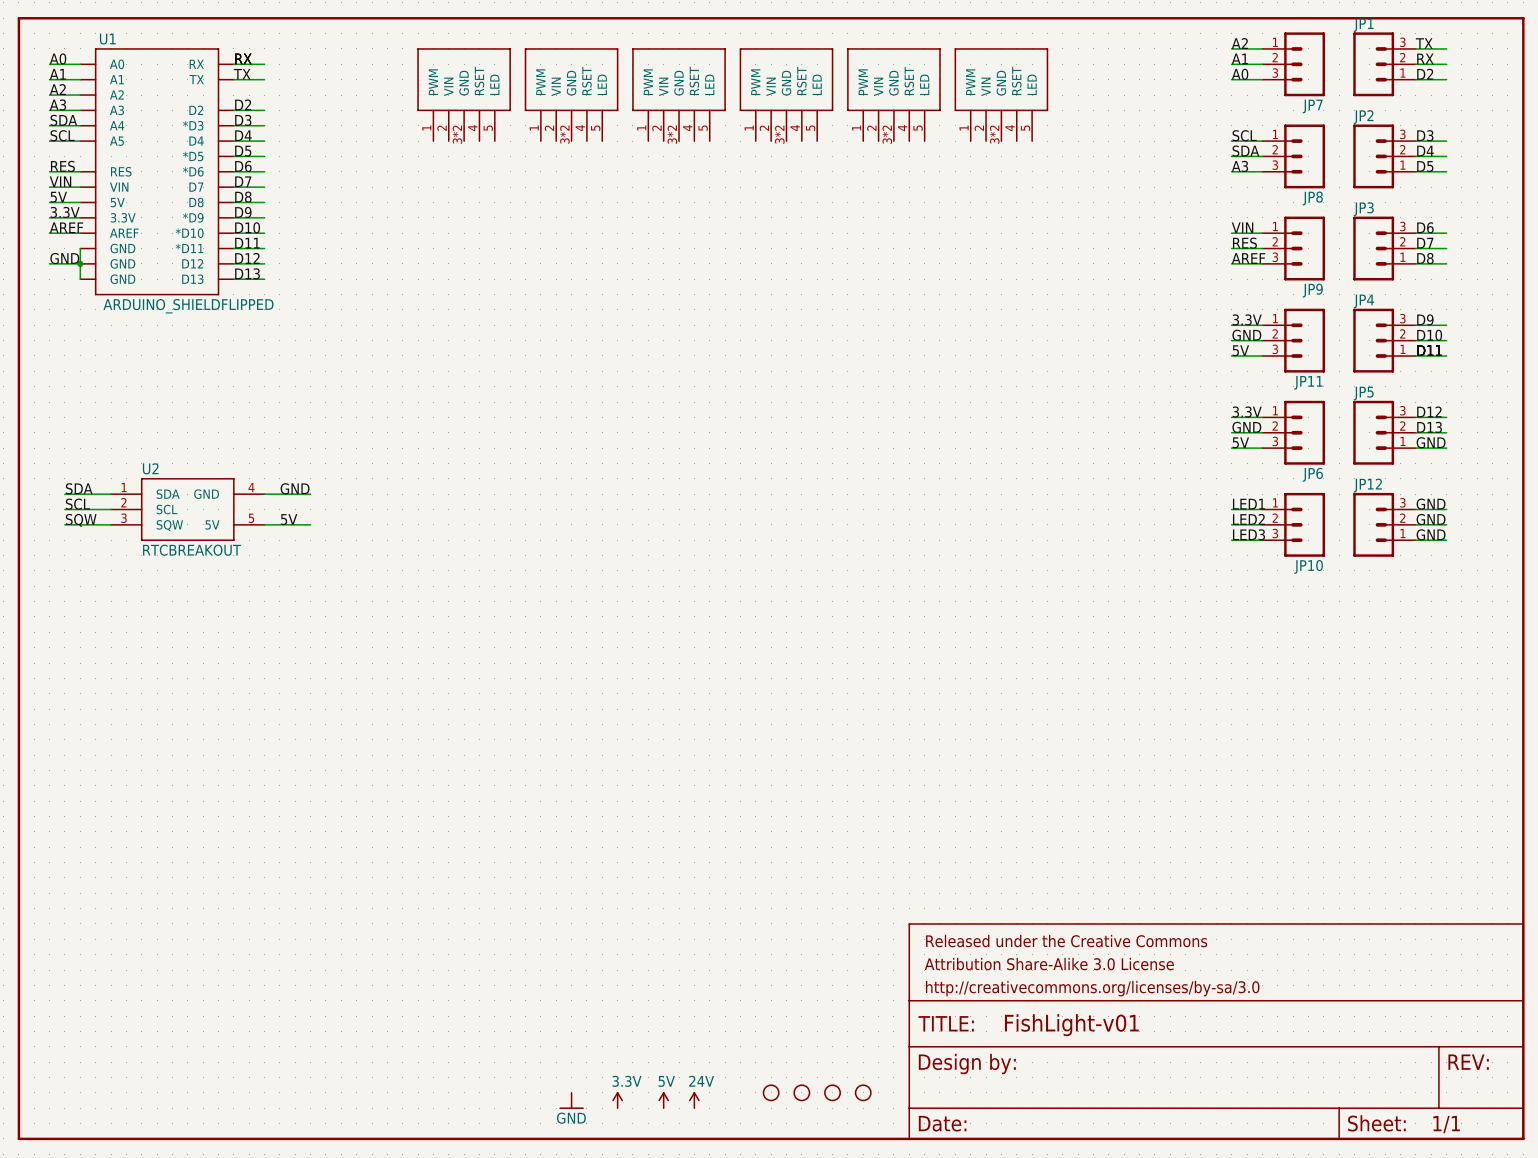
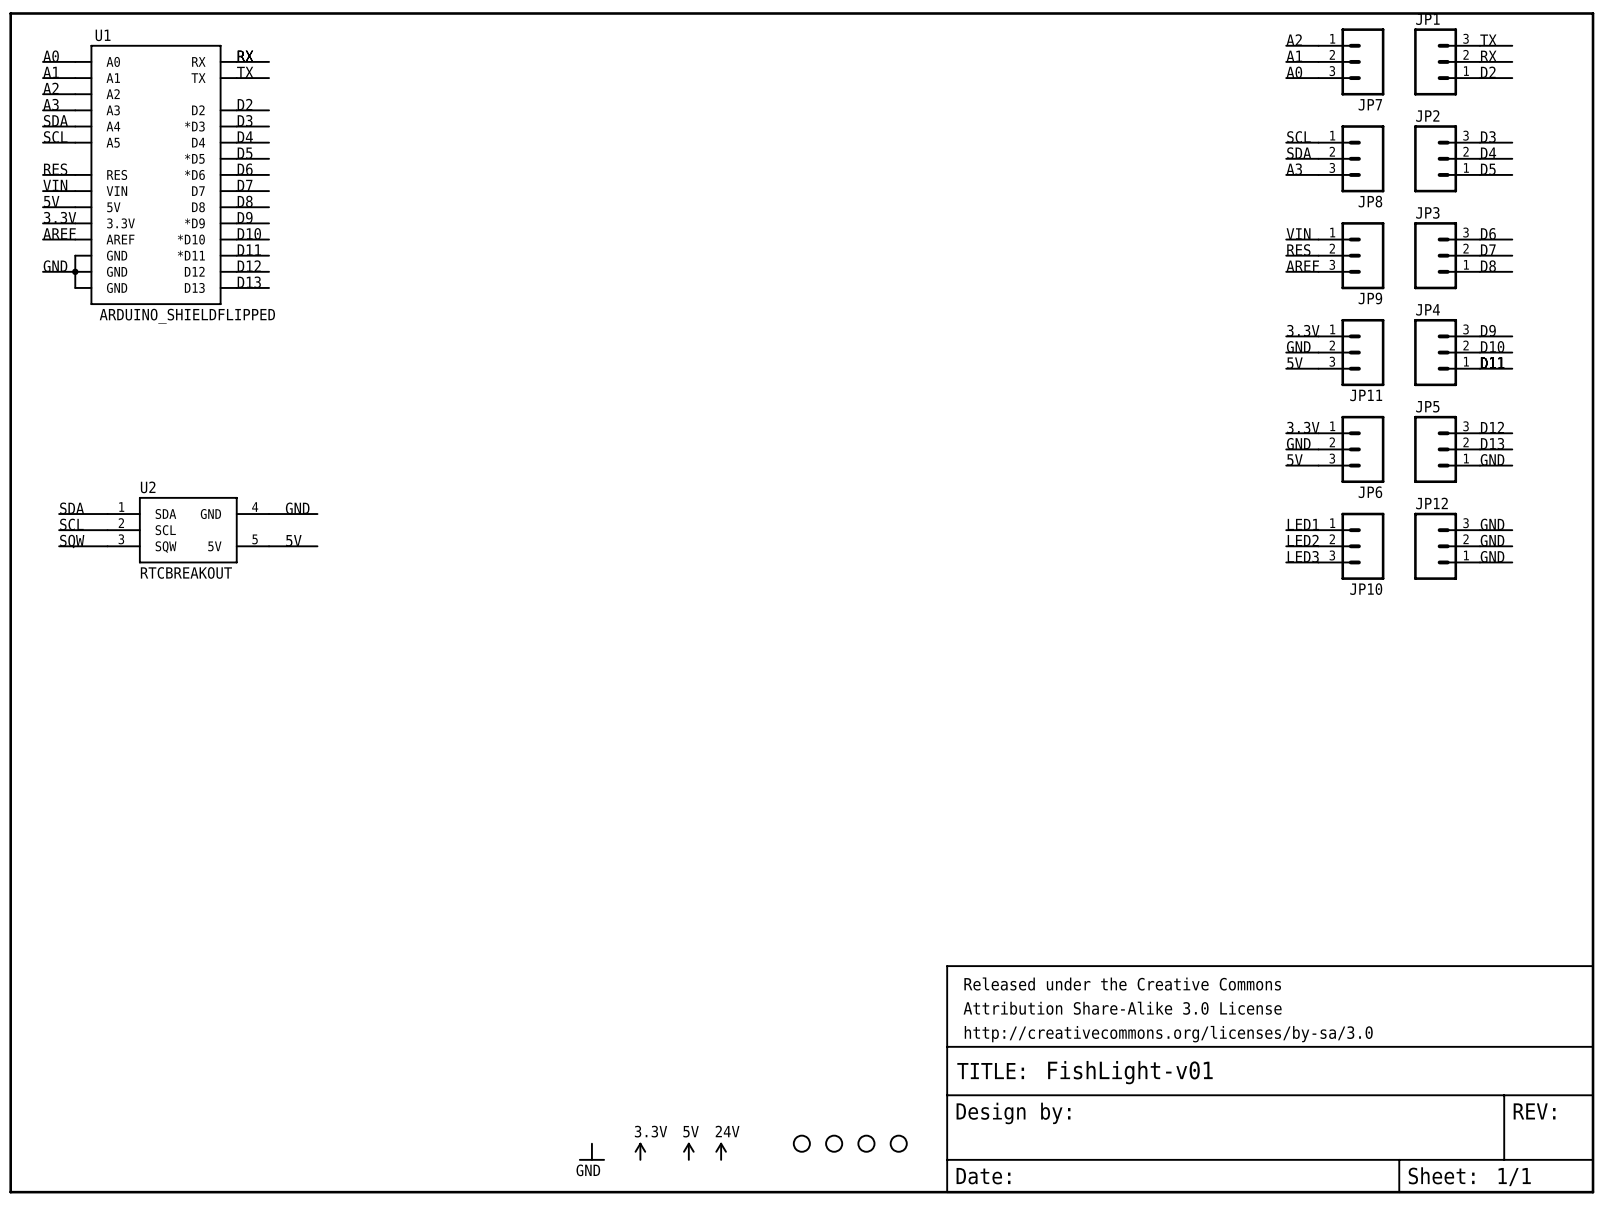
part: (464, 94) -> none
part: (571, 94) -> none
part: (679, 94) -> none
part: (786, 94) -> none
part: (893, 94) -> none
part: (1001, 94) -> none

